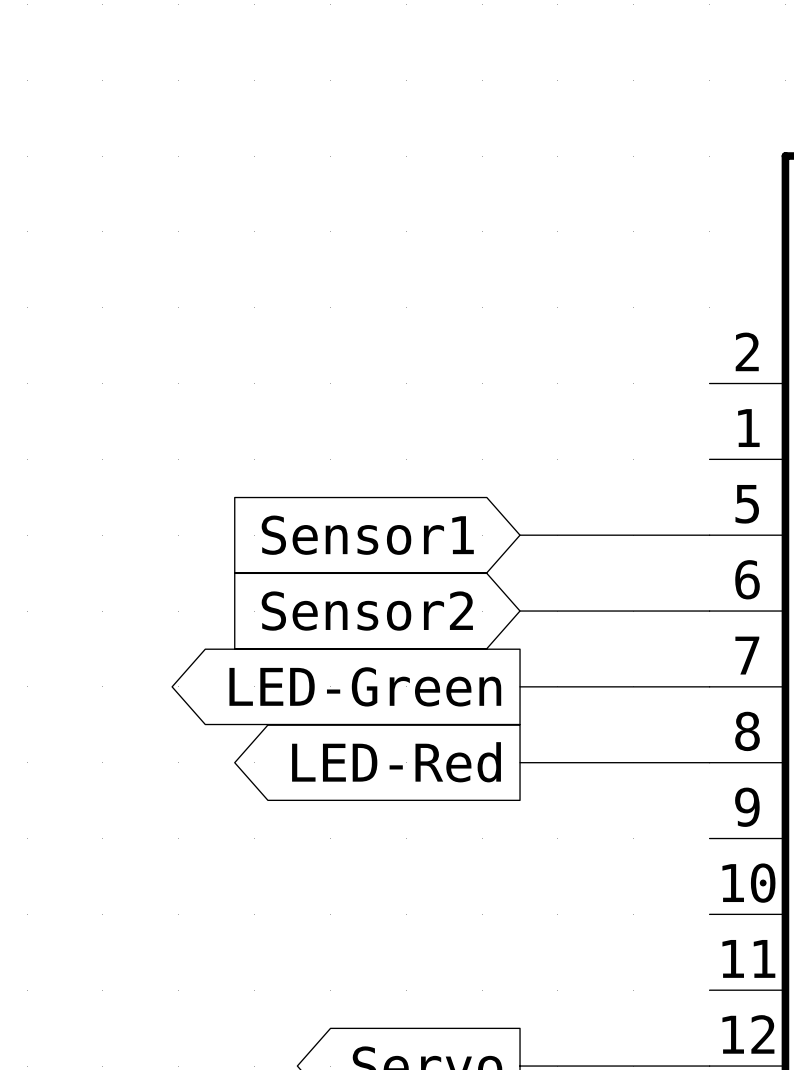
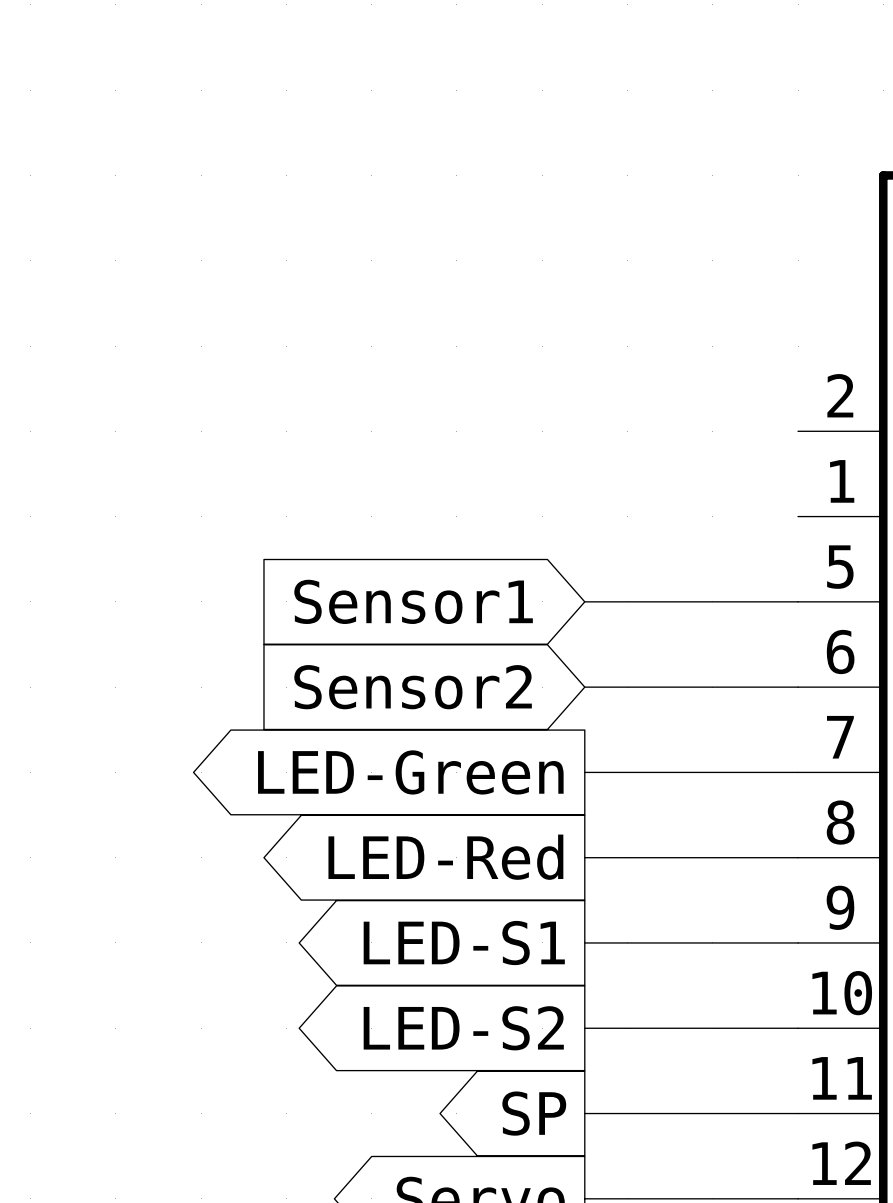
global label: none -> LED-S1 (464, 943)
wire: none -> (584, 942) (798, 942)
global label: none -> LED-S2 (463, 1028)
wire: none -> (584, 1028) (798, 1028)
global label: none -> SP (534, 1113)
wire: none -> (584, 1113) (798, 1113)

